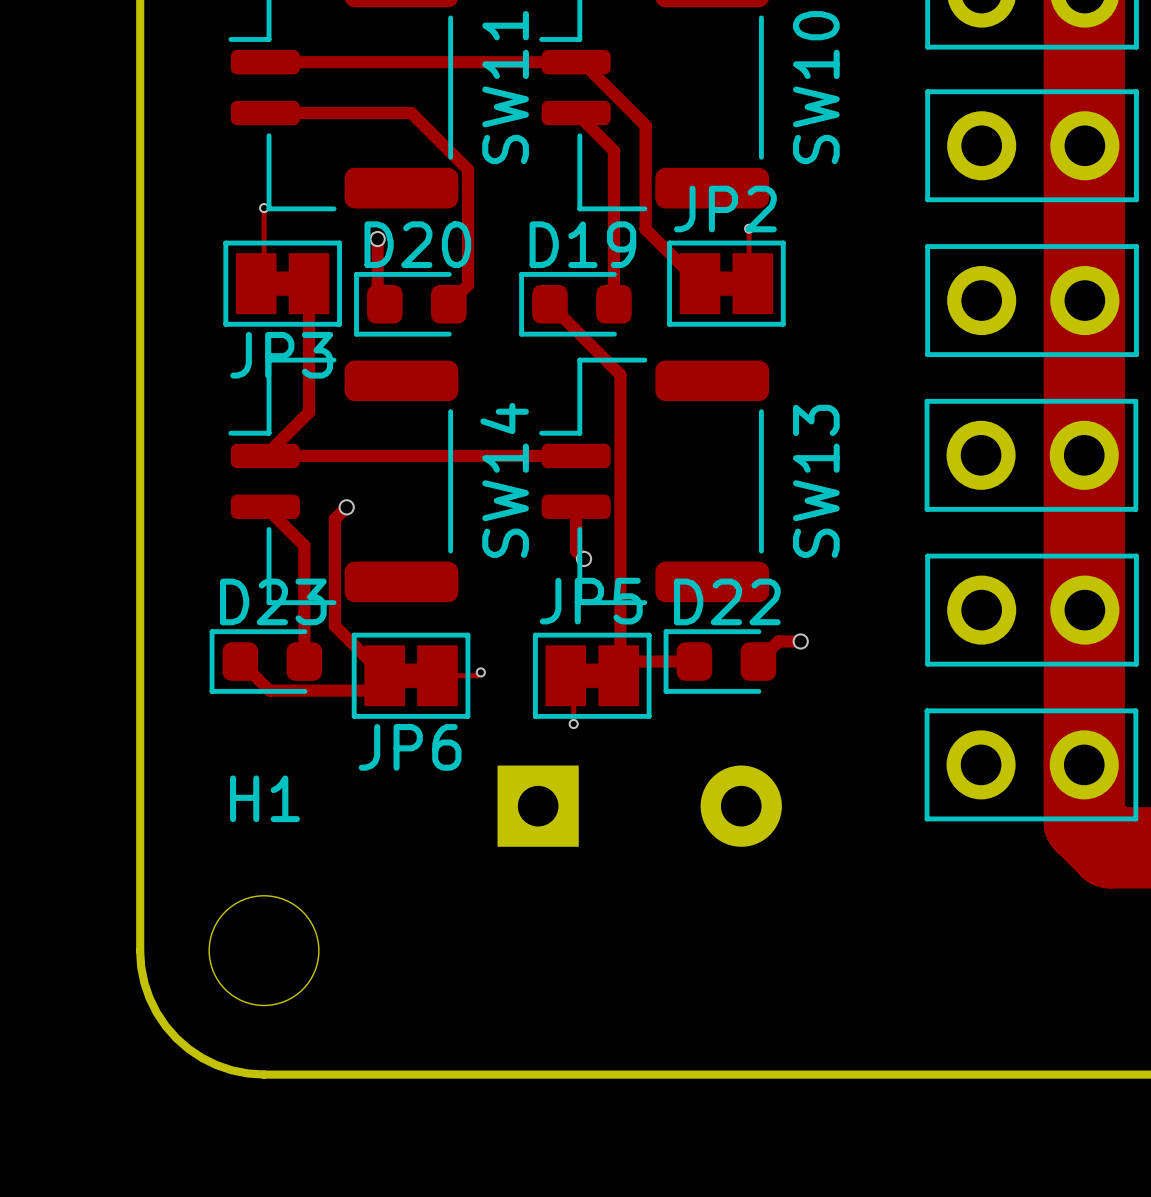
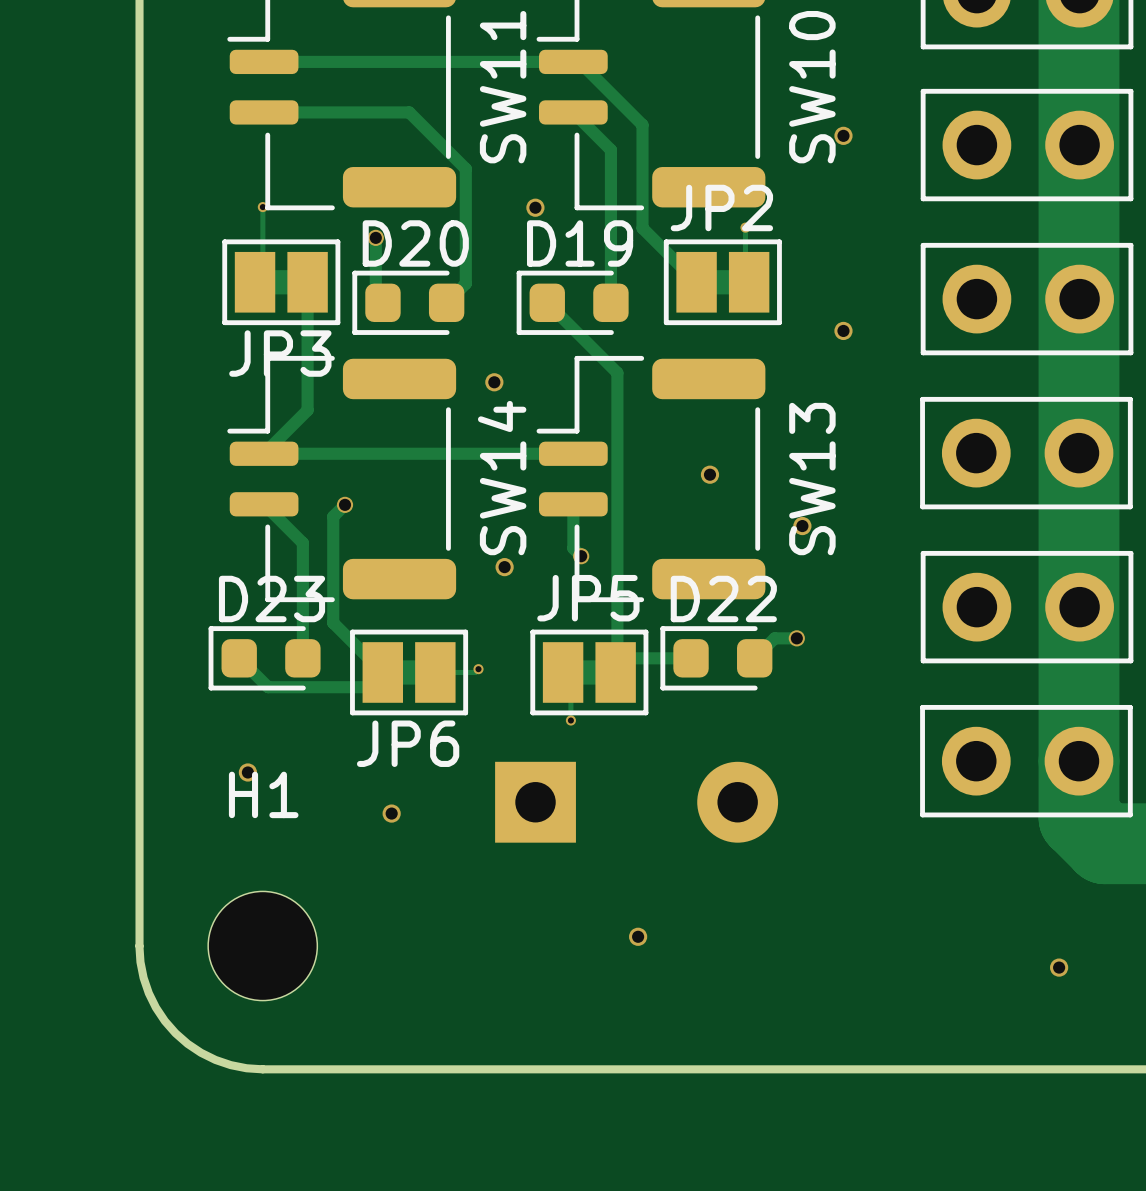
via: none -> (843, 135)
via: none -> (535, 207)
via: none -> (843, 330)
via: none -> (494, 382)
via: none -> (709, 474)
via: none -> (802, 526)
via: none -> (504, 567)
via: none -> (247, 772)
via: none -> (391, 813)
via: none -> (638, 936)
via: none -> (1059, 967)

